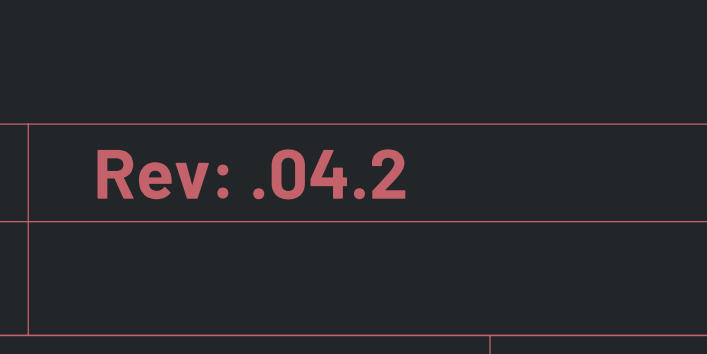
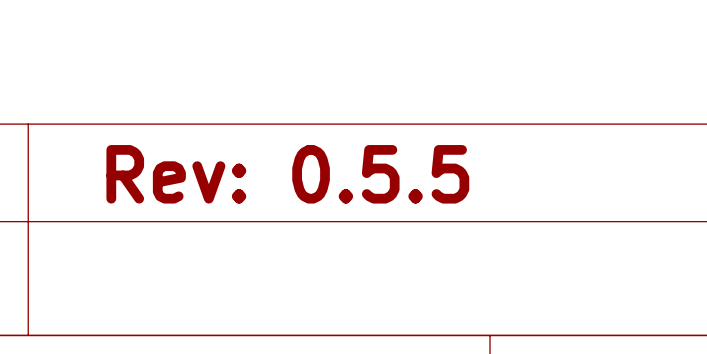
title block: Rev: .04.2 (251, 174) -> Rev: 0.5.5 (287, 174)

